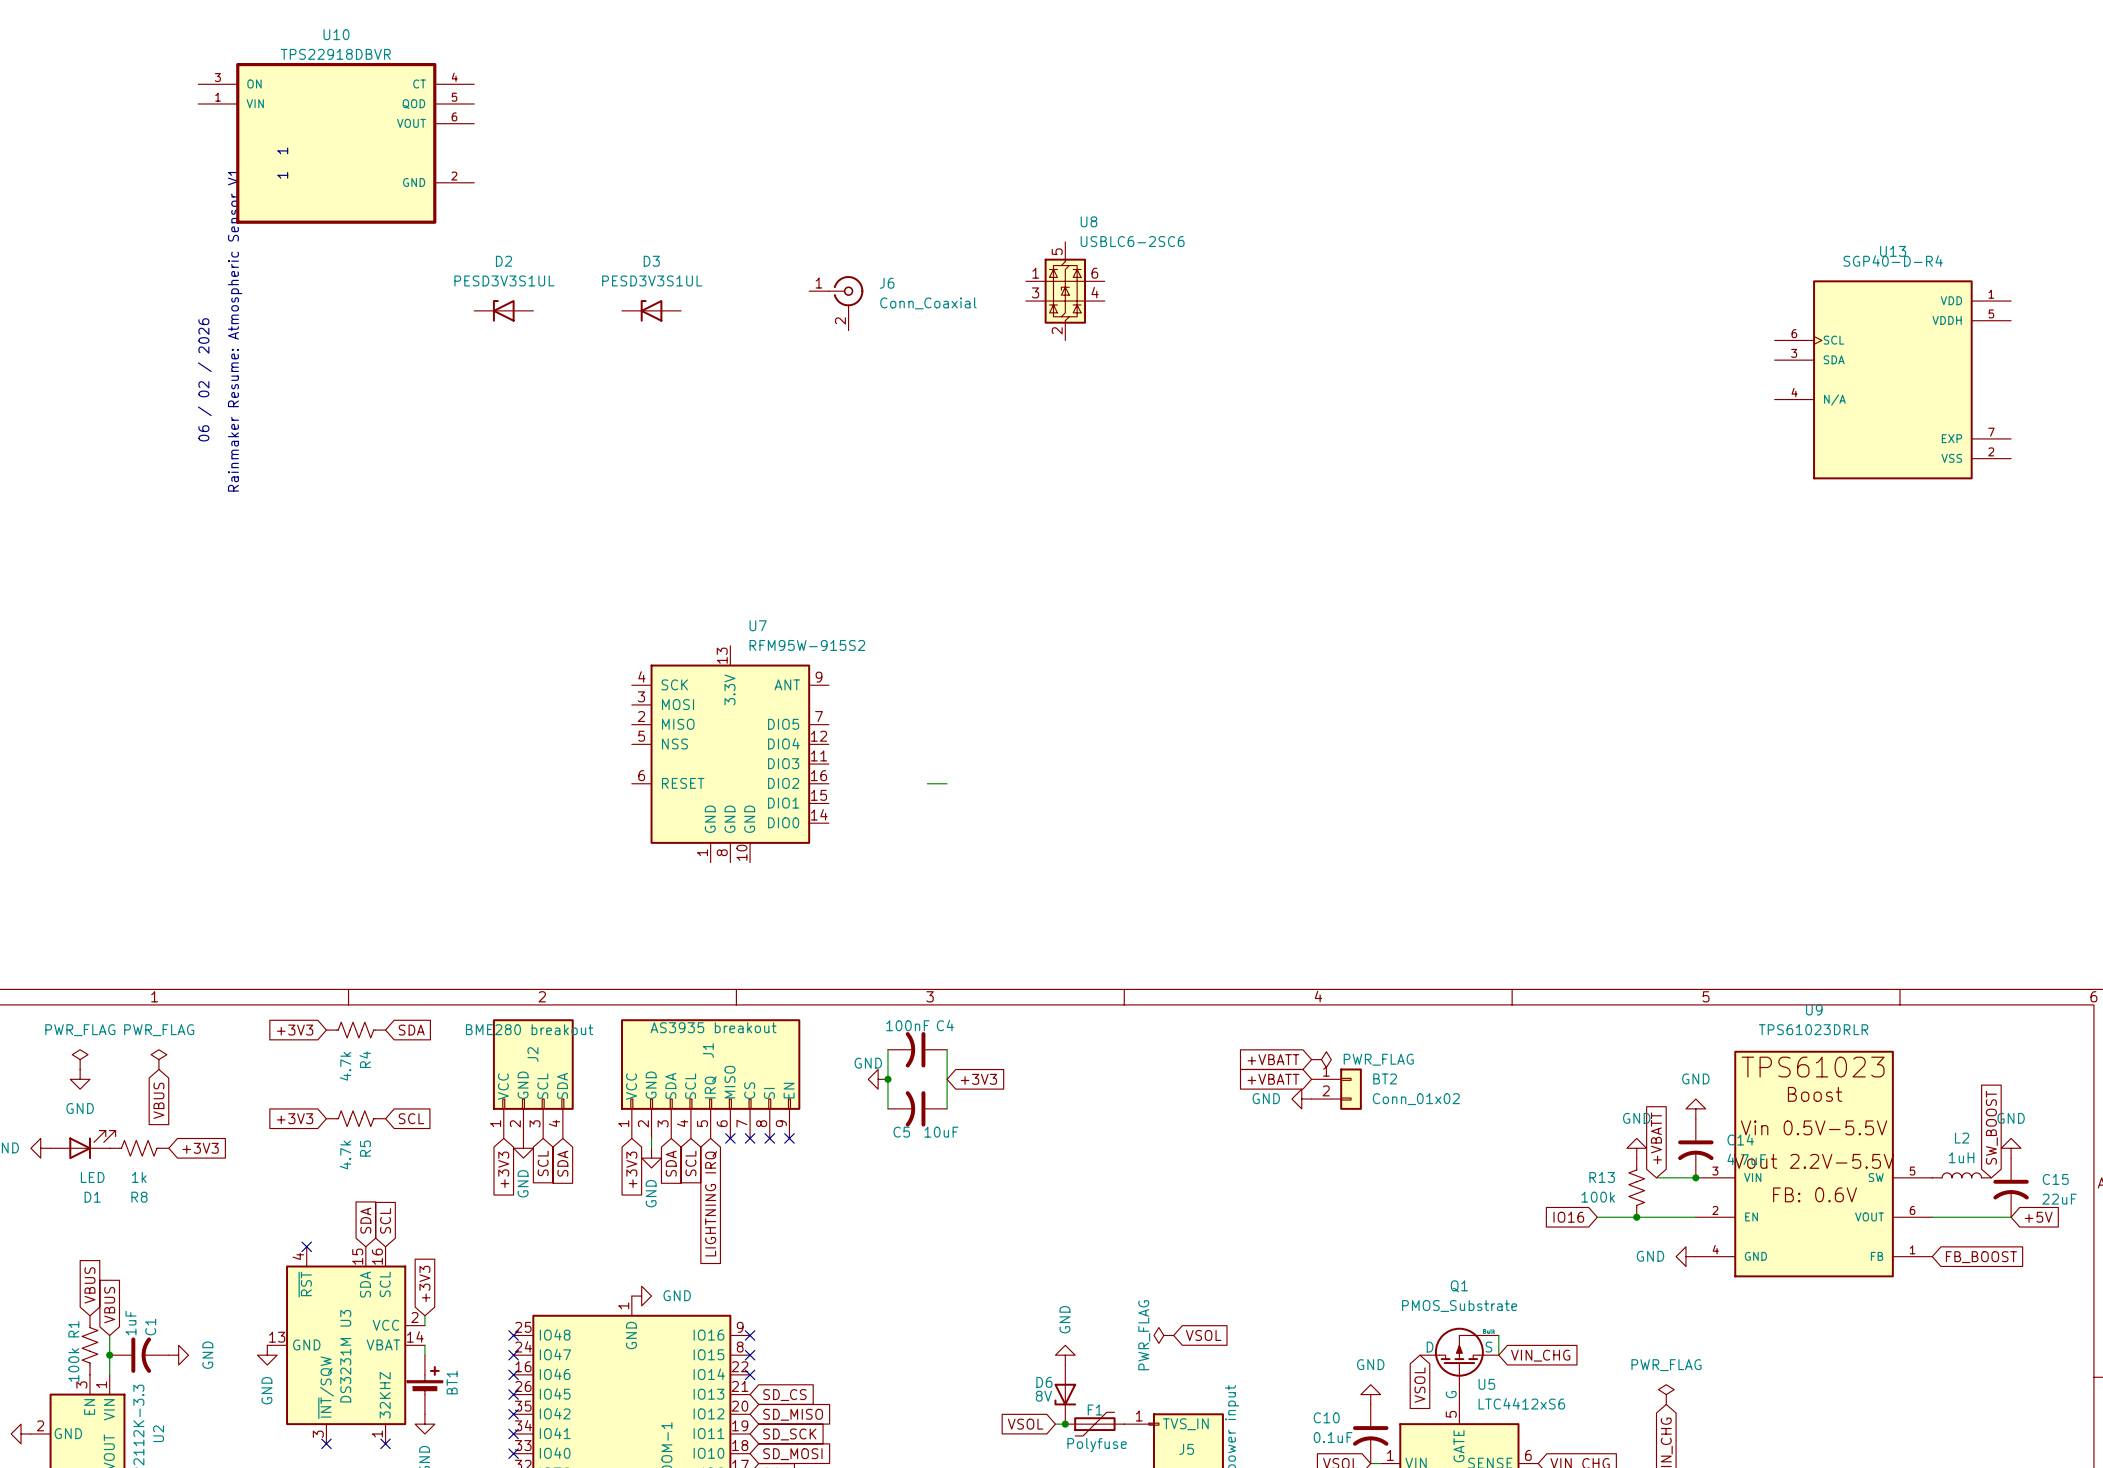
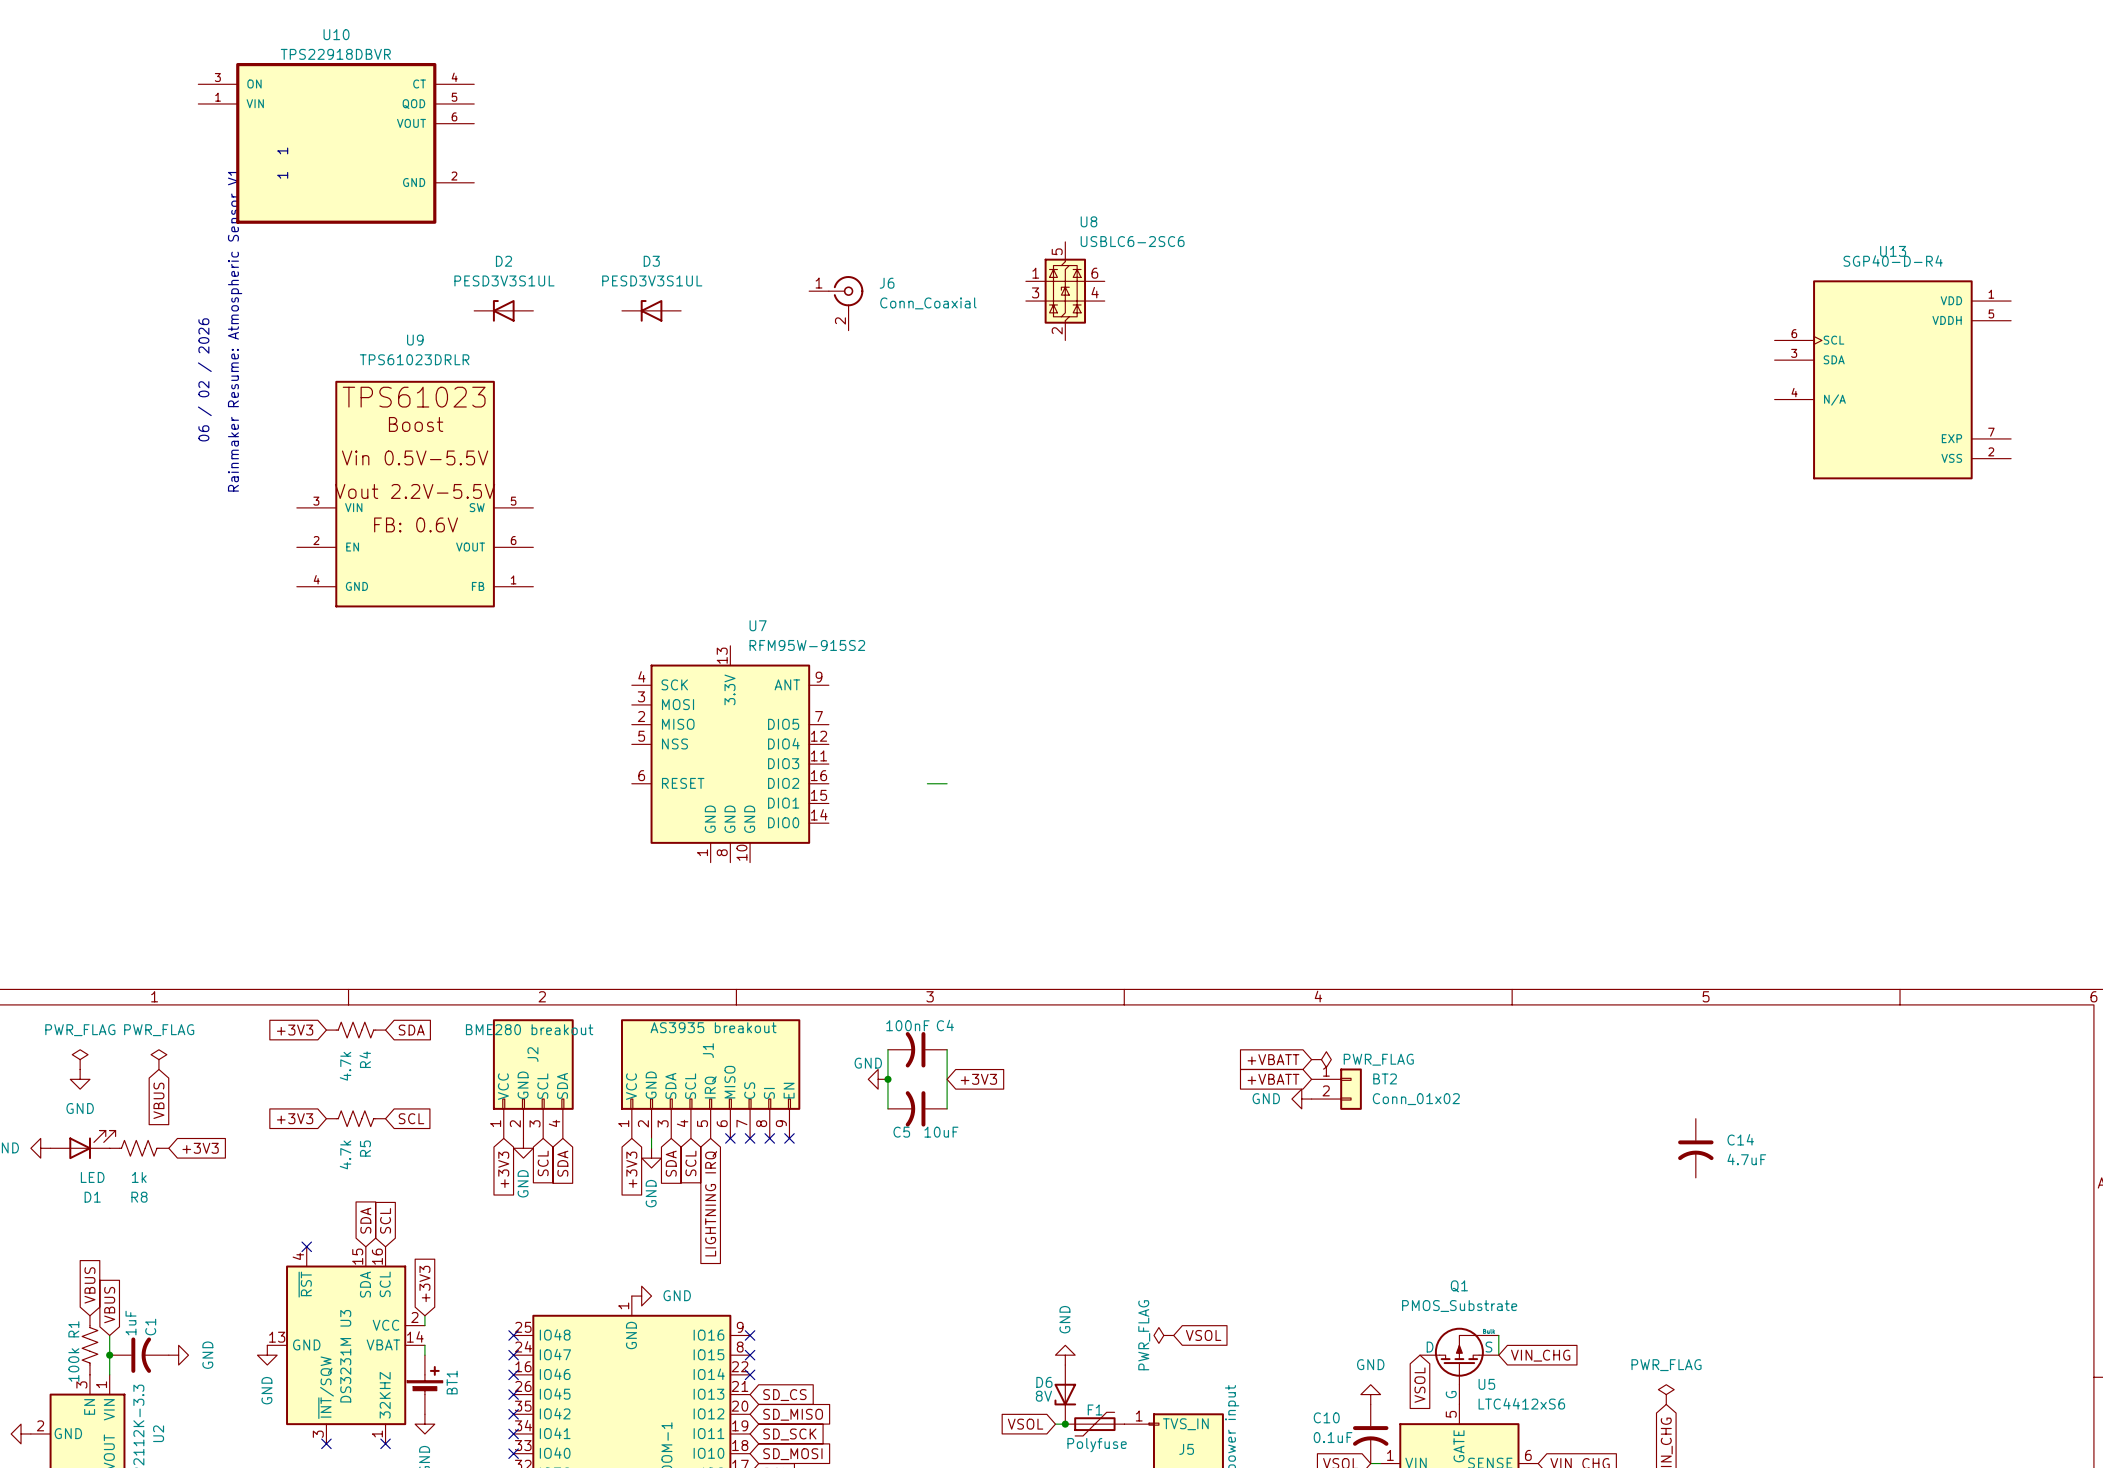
power symbol: GND (1695, 1108) -> none
global label: SW_BOOST (1991, 1127) -> none
global label: +VBATT (1656, 1138) -> none
power symbol: GND (1636, 1148) -> none
power symbol: GND (2011, 1148) -> none
U9 position: (1814, 1164) -> (415, 494)
L2: 1uH (1961, 1175) -> none
wire: (1656, 1177) (1695, 1177) -> none
junction: (1695, 1177) -> none
R13: 100k (1636, 1187) -> none
C15: 22uF (2011, 1187) -> none
global label: IO16 (1568, 1217) -> none
wire: (1597, 1217) (1695, 1217) -> none
junction: (1636, 1217) -> none
wire: (1932, 1217) (2011, 1217) -> none
global label: +5V (2038, 1217) -> none
power symbol: GND (1685, 1256) -> none
global label: FB_BOOST (1981, 1257) -> none

